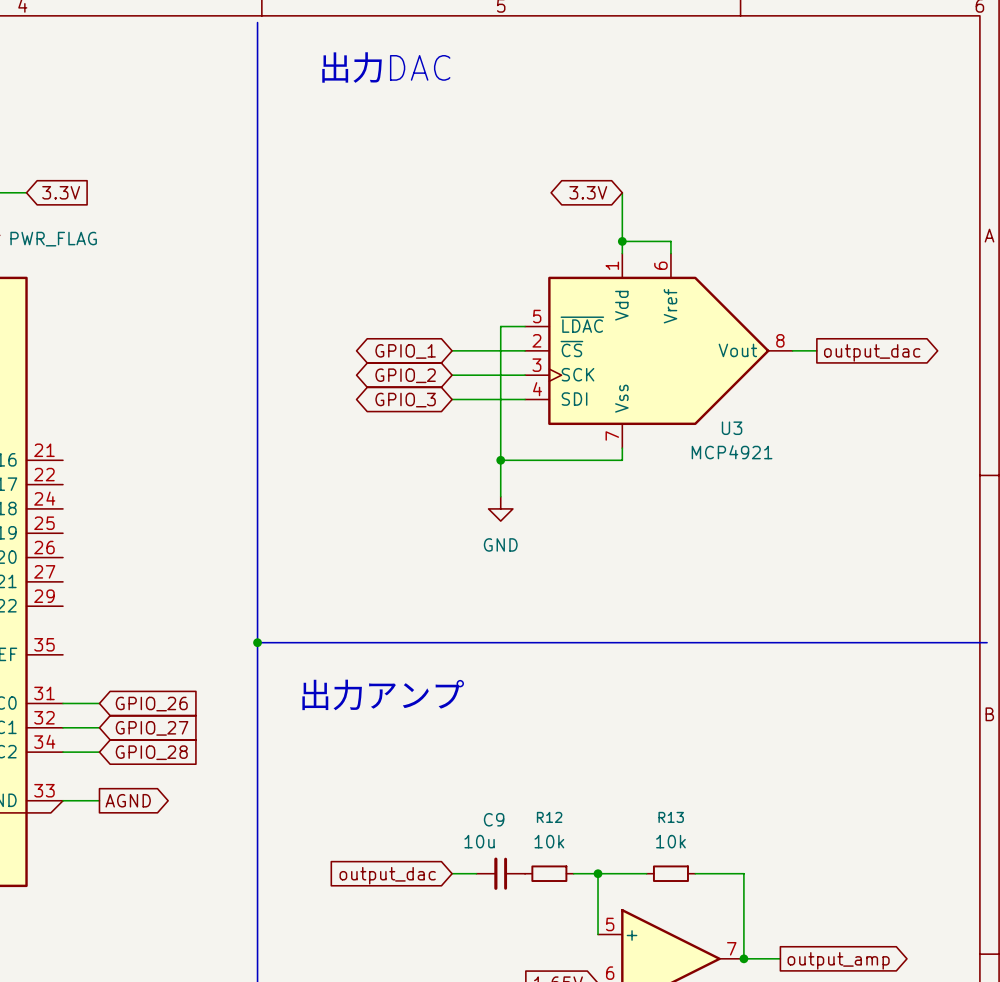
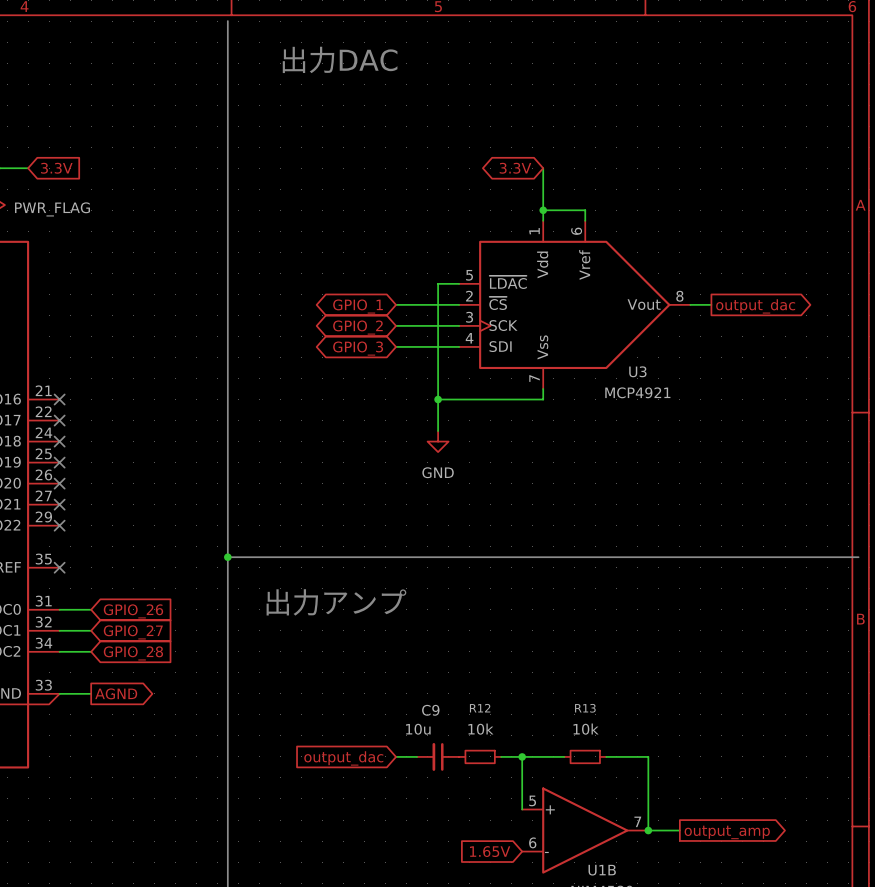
no-connect mark: none -> (59, 399)
no-connect mark: none -> (59, 420)
no-connect mark: none -> (59, 441)
no-connect mark: none -> (59, 462)
no-connect mark: none -> (59, 483)
no-connect mark: none -> (59, 504)
no-connect mark: none -> (59, 525)
no-connect mark: none -> (59, 567)

